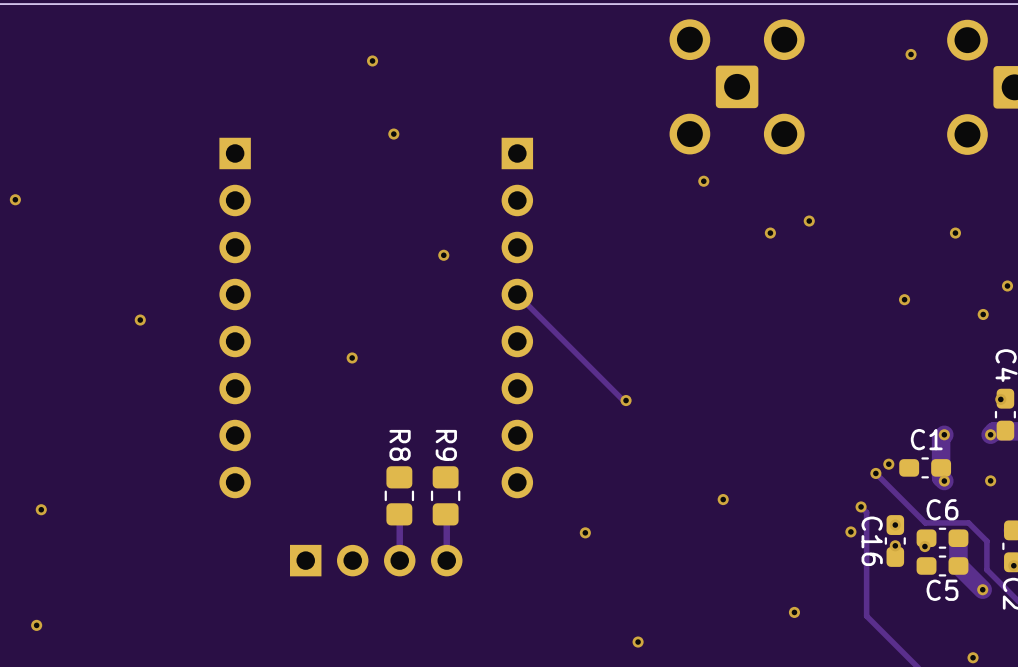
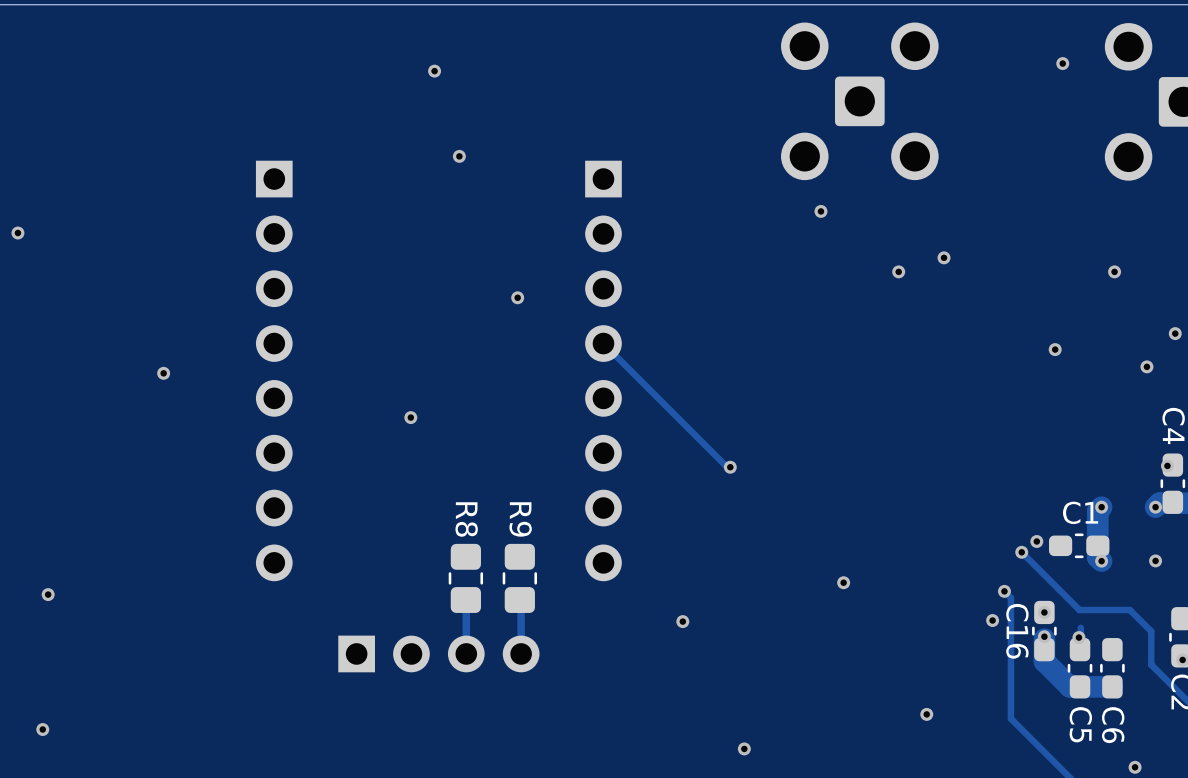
C6 name position: C6 (942, 509) -> C6 (1113, 725)
C6 rotation: 0° (942, 538) -> 90° clockwise (1112, 668)
C6 position: (942, 538) -> (1112, 668)
track: (958, 538) (958, 565) (982, 589) -> none
track: none -> (1044, 639) (1044, 661) (1069, 686) (1112, 686)
C5 rotation: 0° (942, 565) -> 90° clockwise (1080, 668)
via: (982, 589) -> none

